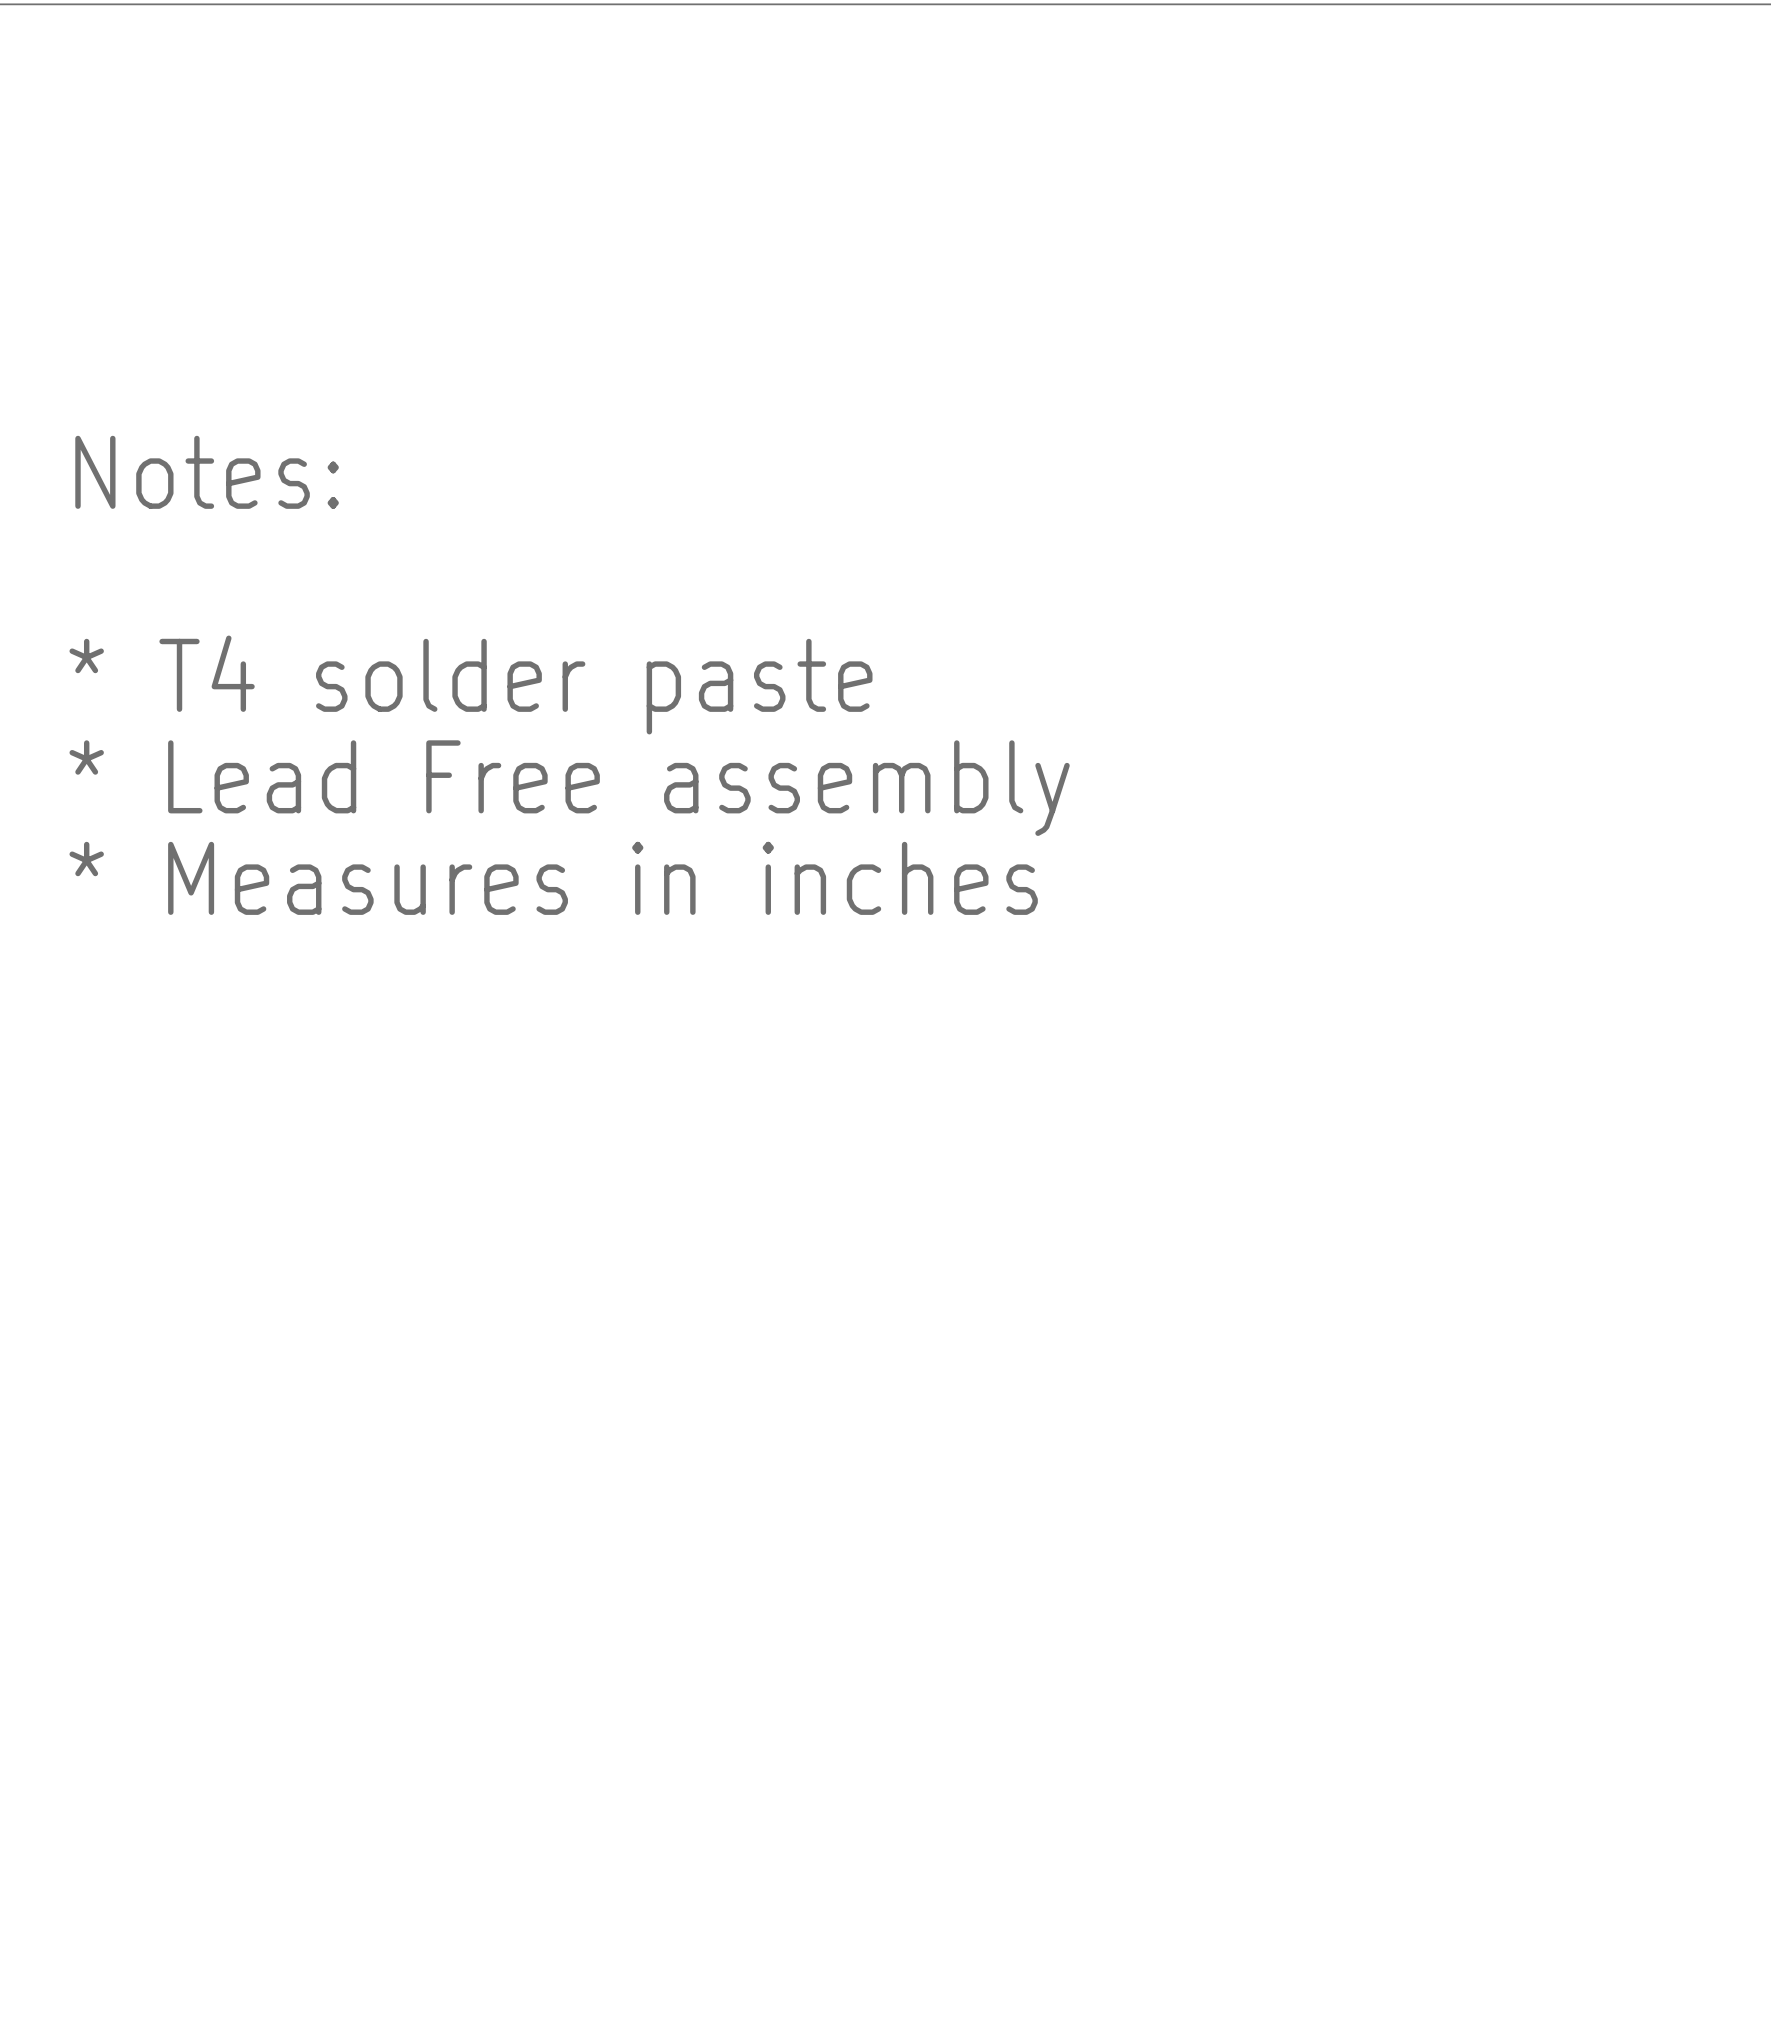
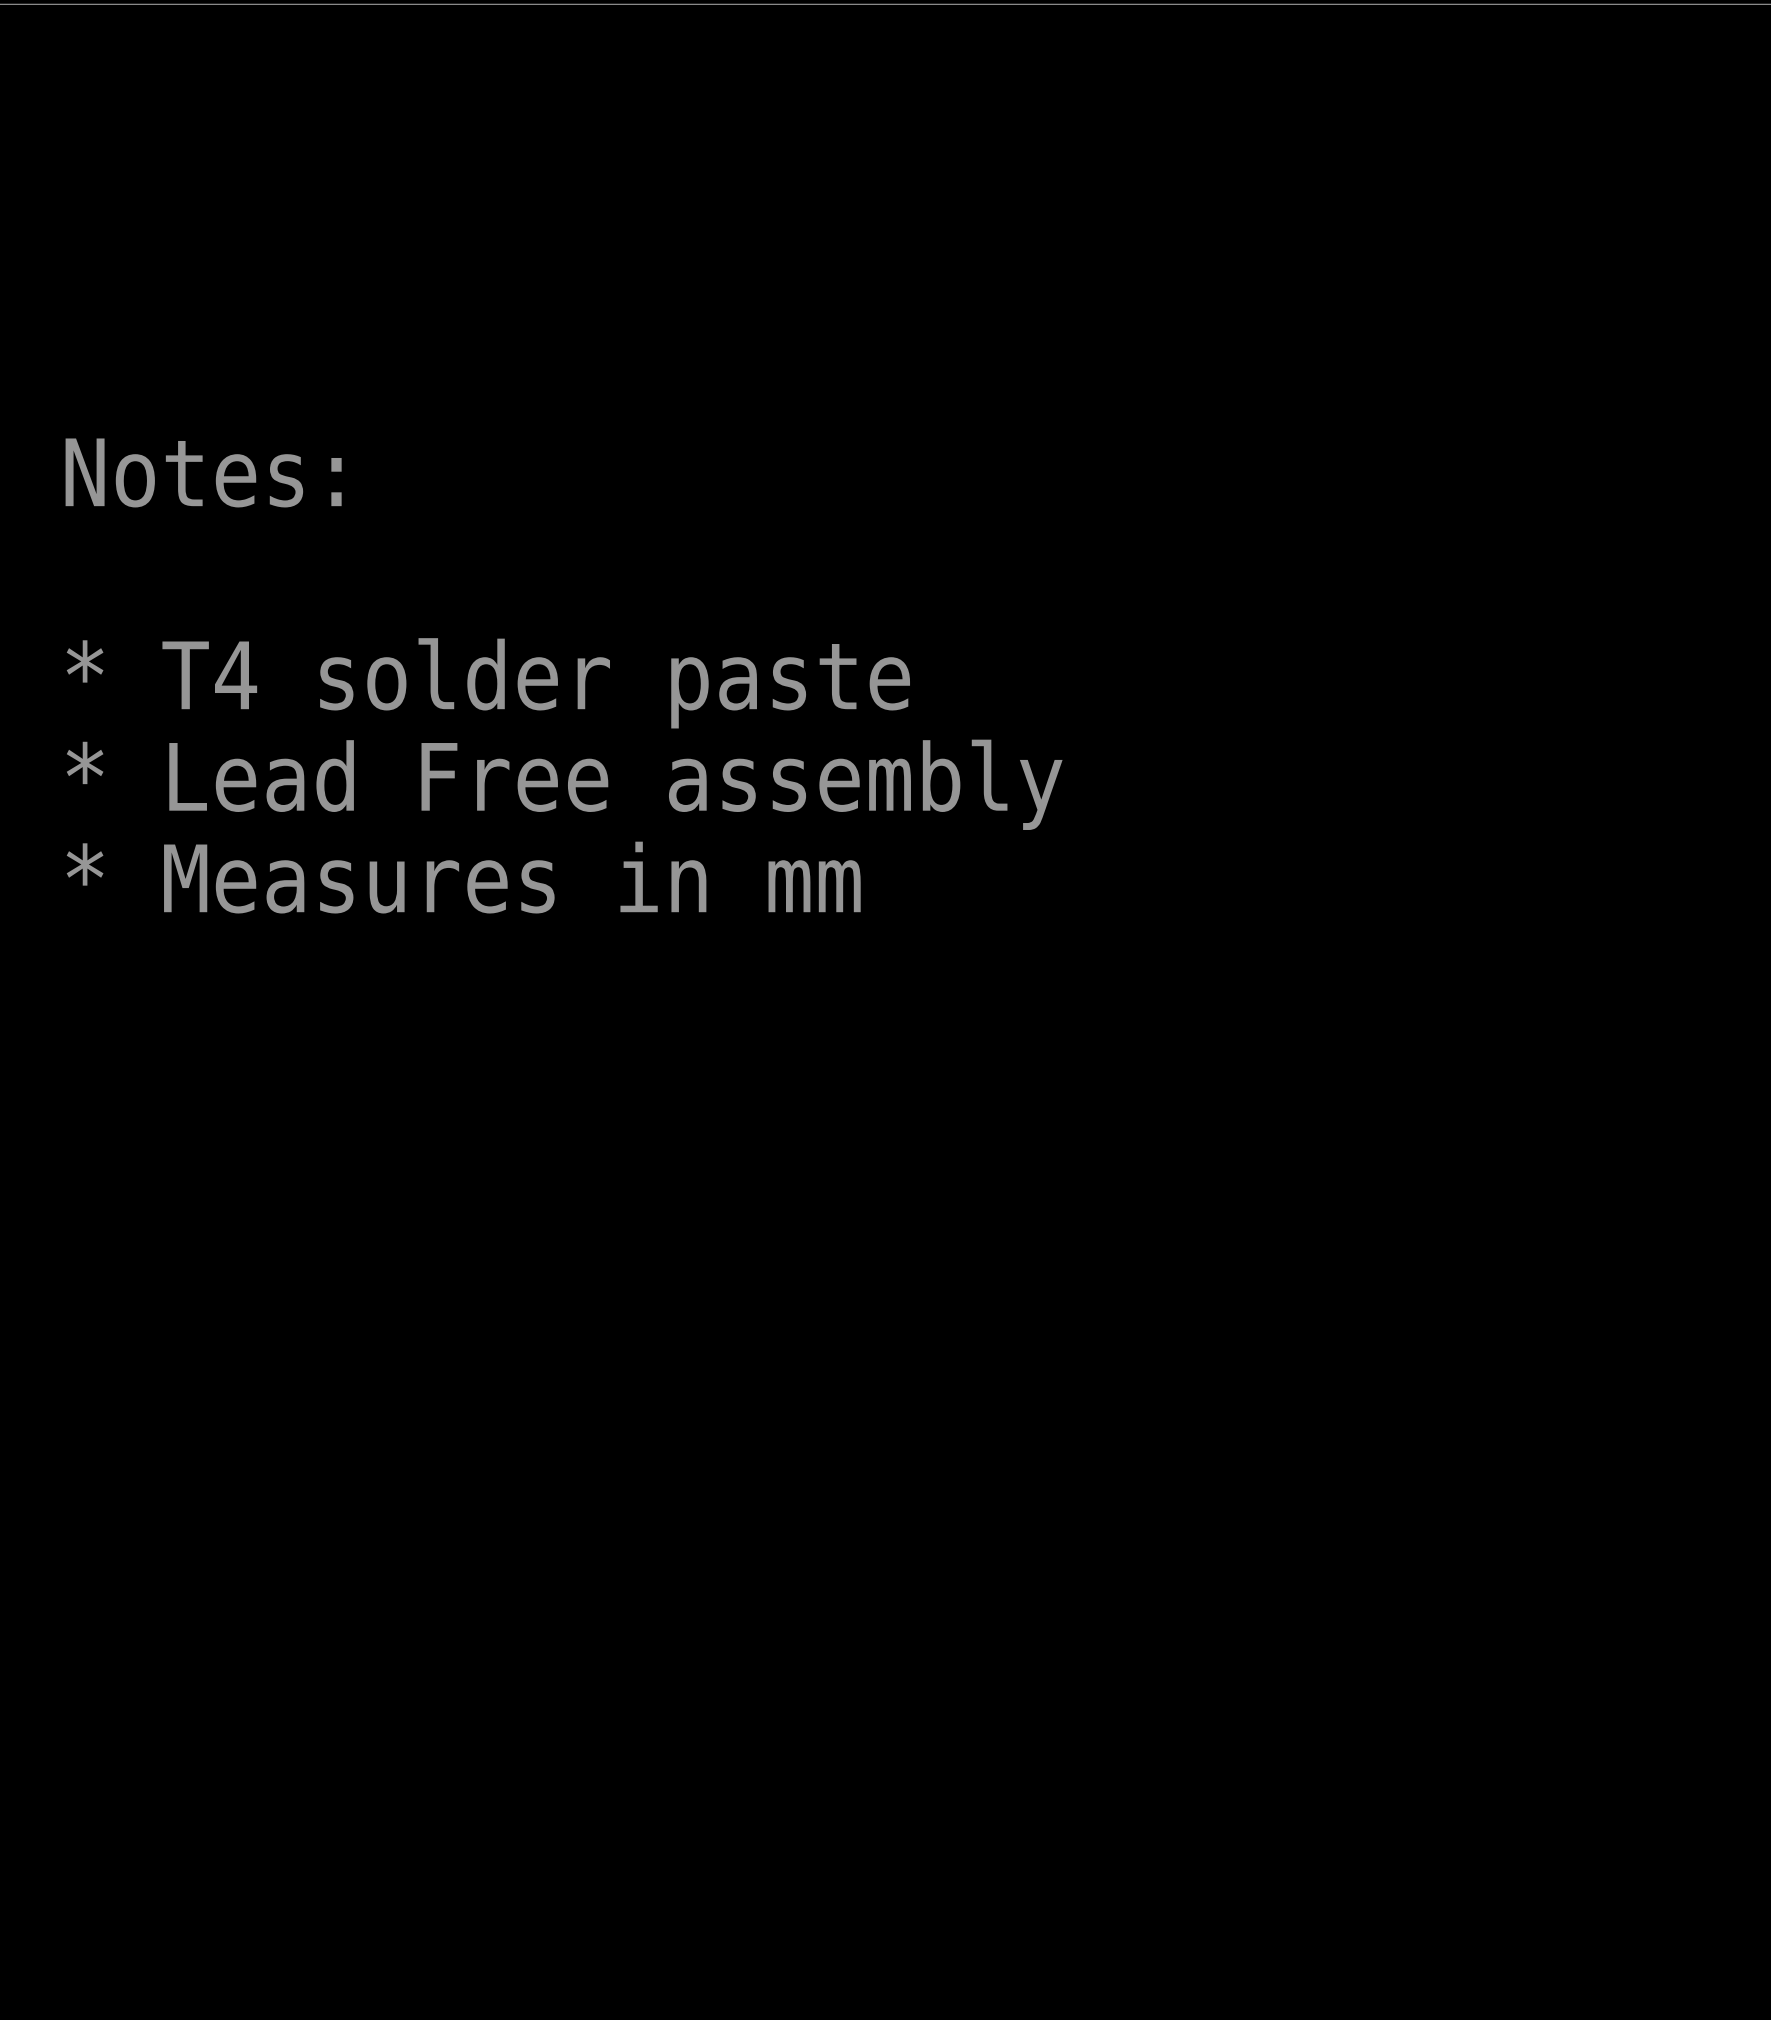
text: * Measures in inches (553, 878) -> * Measures in mm (463, 877)

